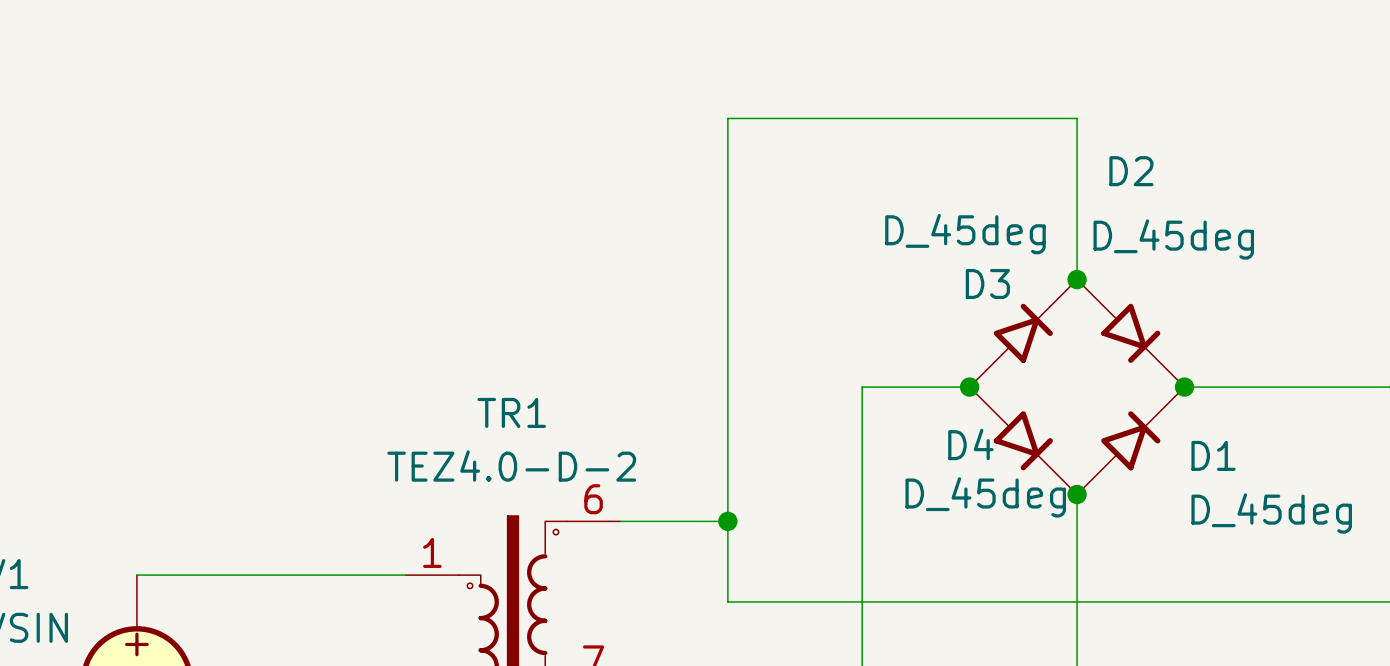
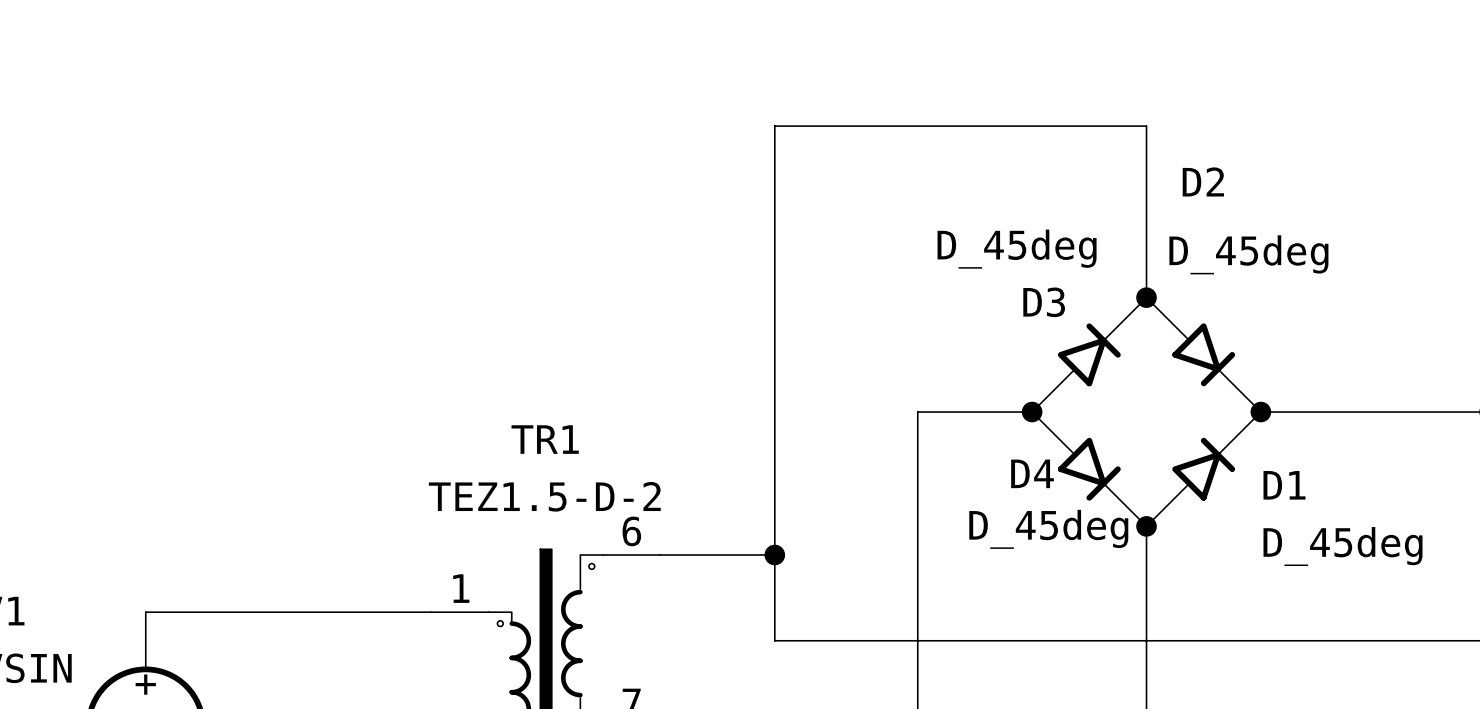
TR1 value: TEZ4.0-D-2 (511, 466) -> TEZ1.5-D-2 (544, 496)

